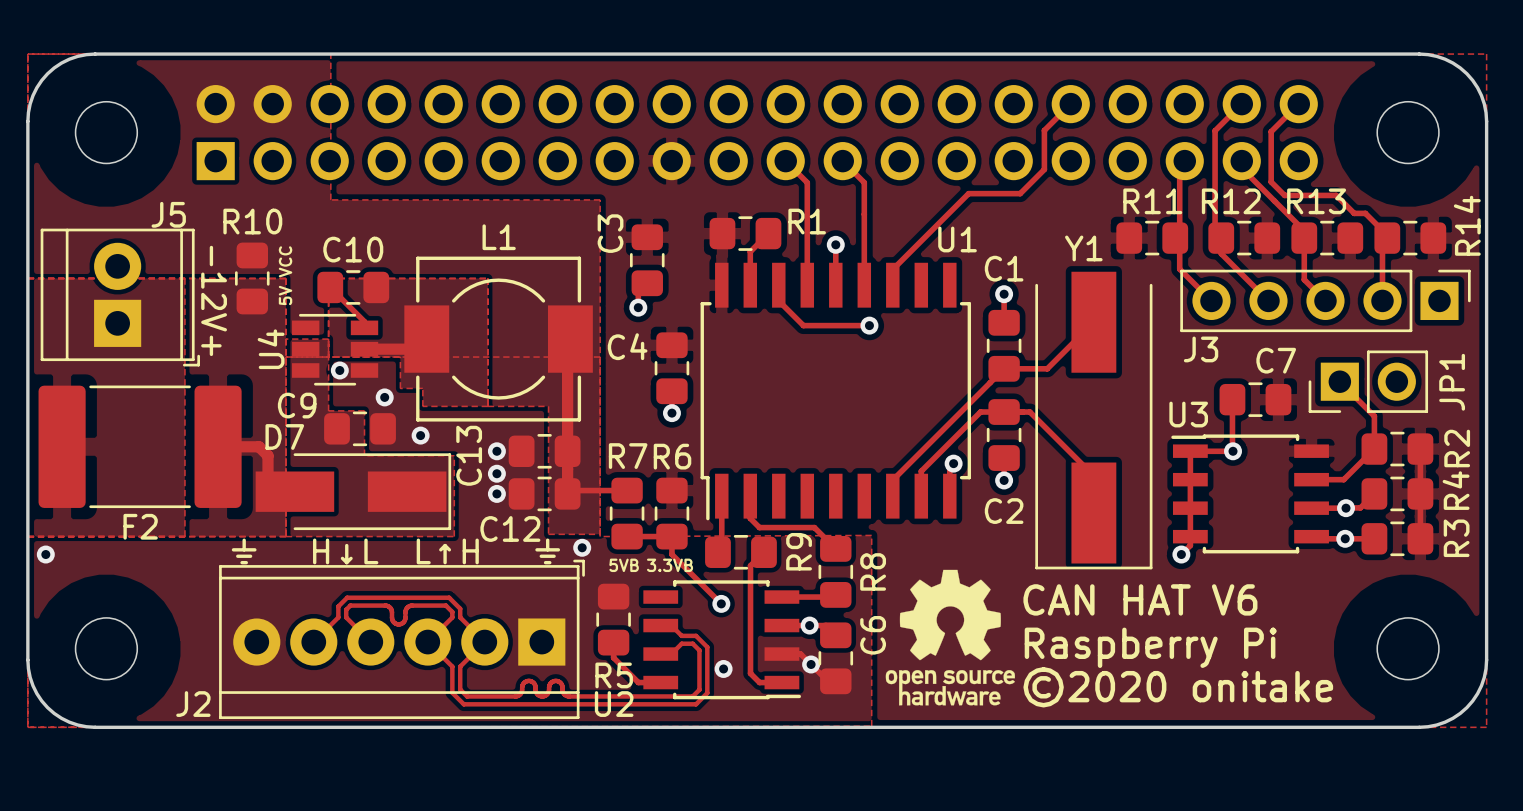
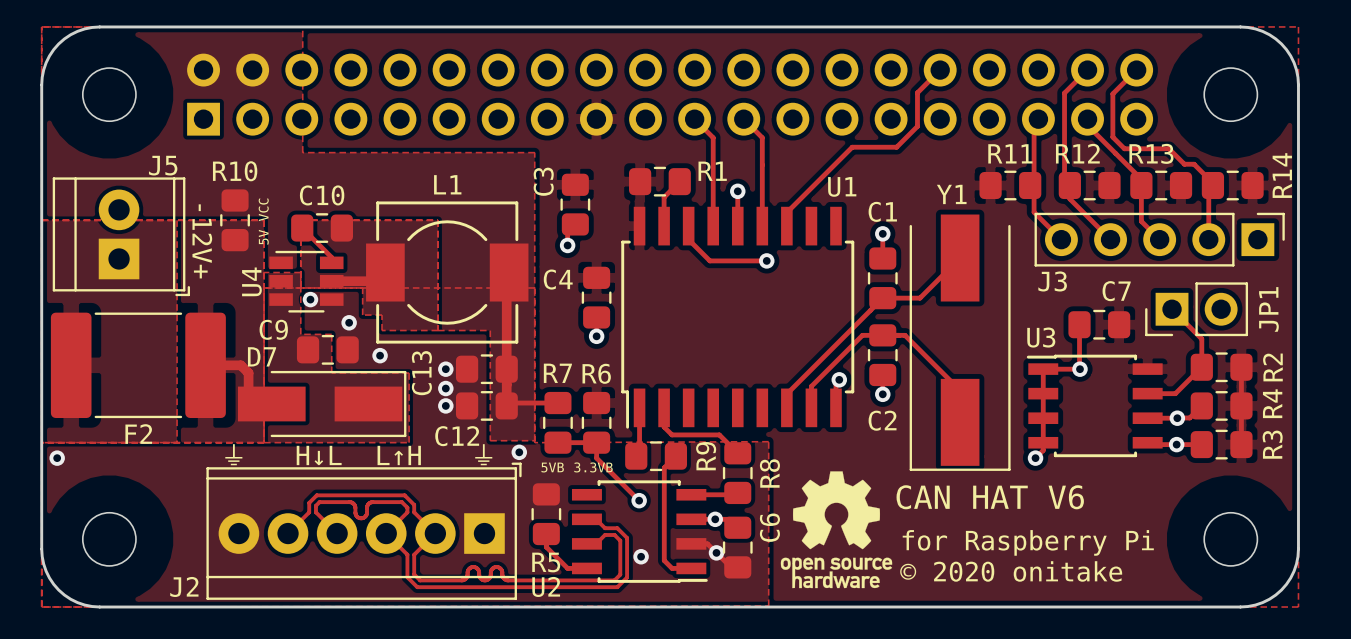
text: Raspberry Pi (1150, 647) -> for Raspberry Pi (1028, 542)
text: ©2020 onitake (1178, 687) -> © 2020 onitake (1011, 571)

